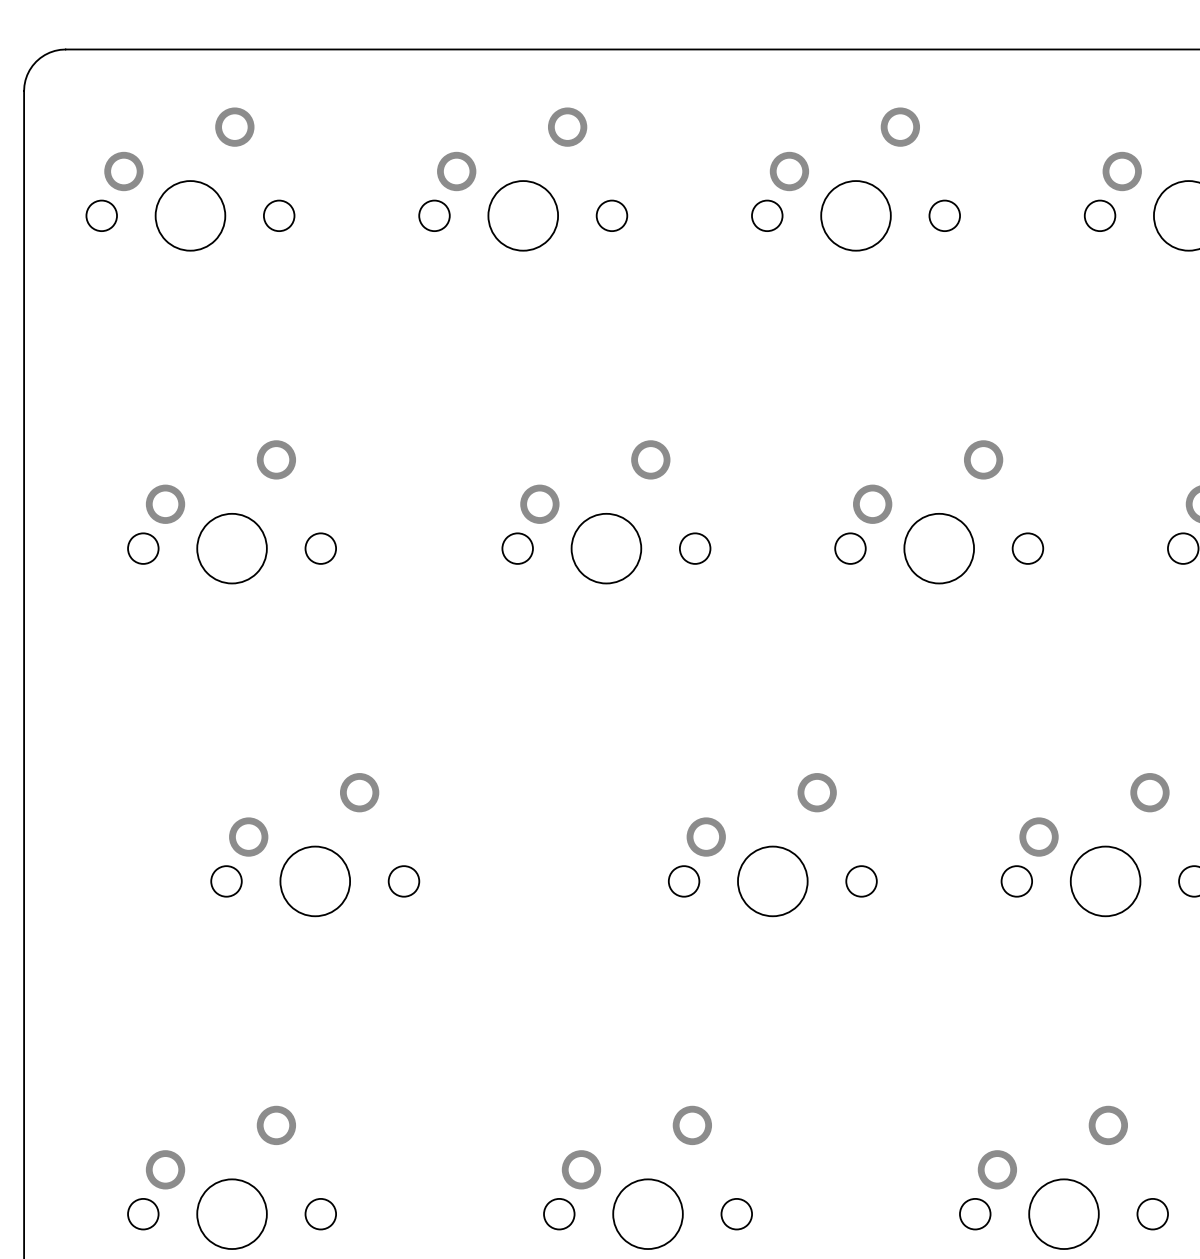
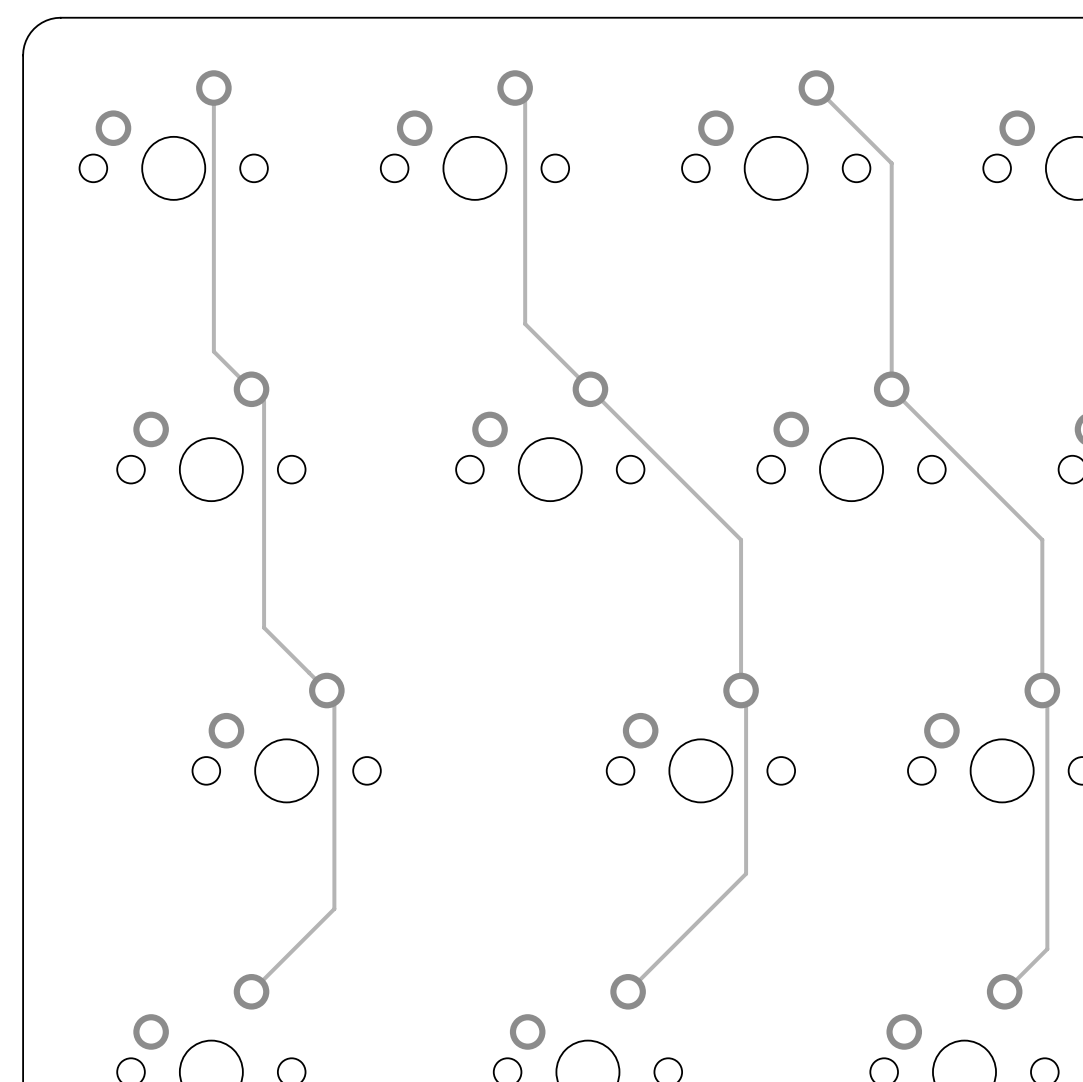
track: none -> (213, 88) (213, 351) (264, 401) (264, 627) (334, 698) (334, 908) (251, 991)
track: none -> (515, 88) (525, 98) (525, 324) (741, 539) (741, 690) (746, 695) (746, 873) (628, 991)
track: none -> (816, 88) (891, 163) (891, 389) (1042, 539) (1042, 690) (1047, 695) (1047, 949) (1004, 991)

